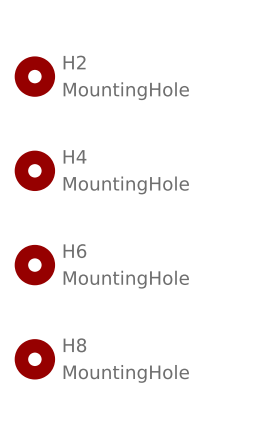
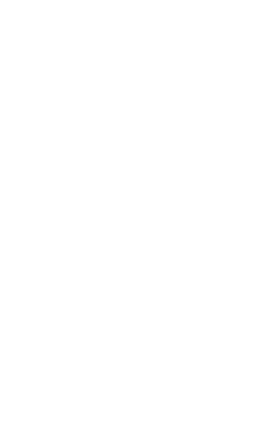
H2: MountingHole (34, 76) -> none
H4: MountingHole (34, 170) -> none
H6: MountingHole (34, 265) -> none
H8: MountingHole (34, 359) -> none

